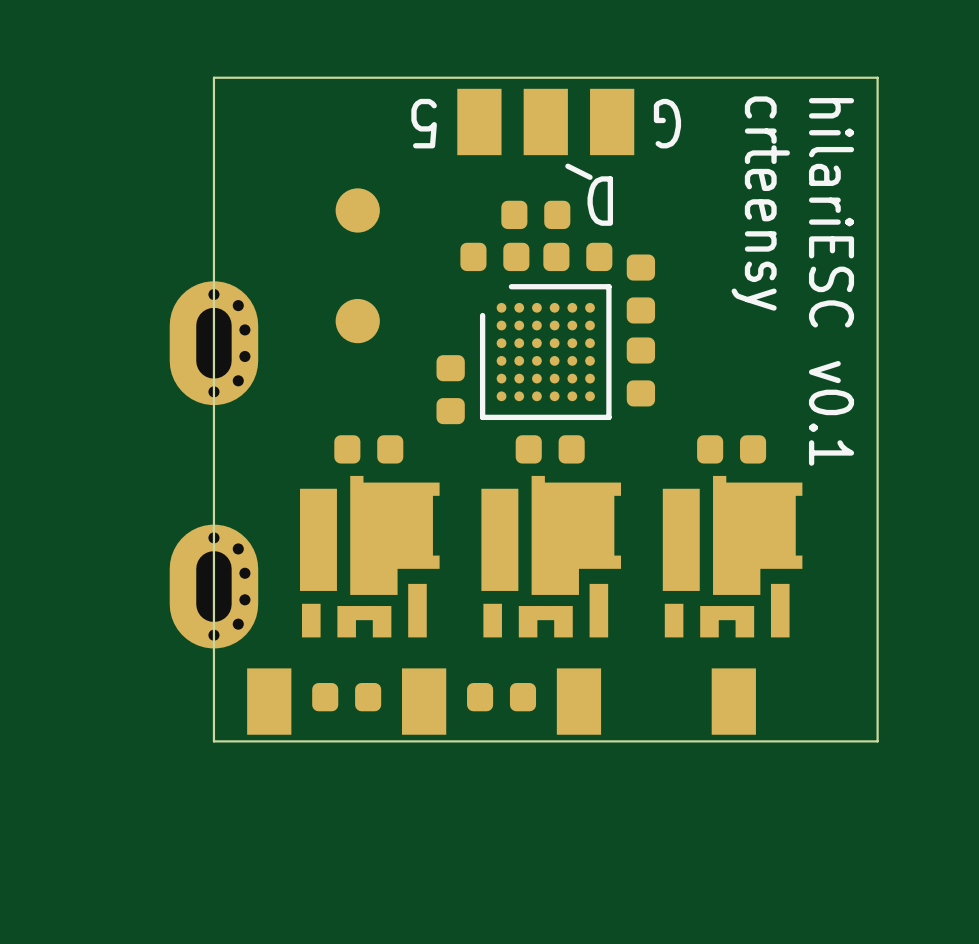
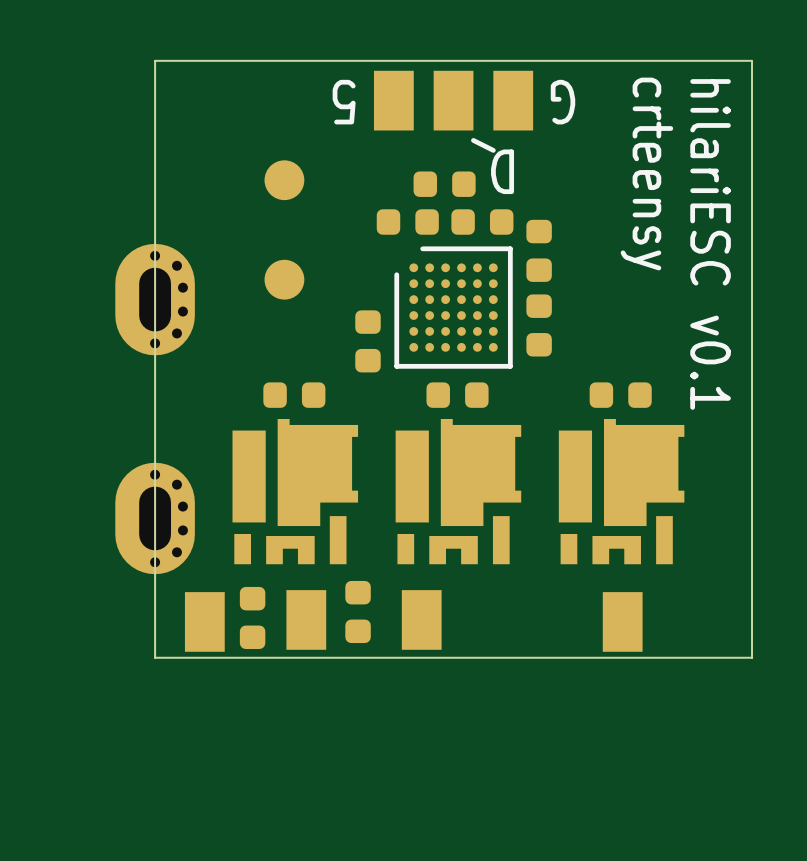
part footprint: [401, 668, 447, 735] -> [345, 580, 371, 644]
part footprint: [467, 682, 537, 712] -> [401, 590, 442, 650]
part rotation: 0° (346, 697) -> 90° clockwise (252, 617)
part position: (578, 701) -> (306, 619)

